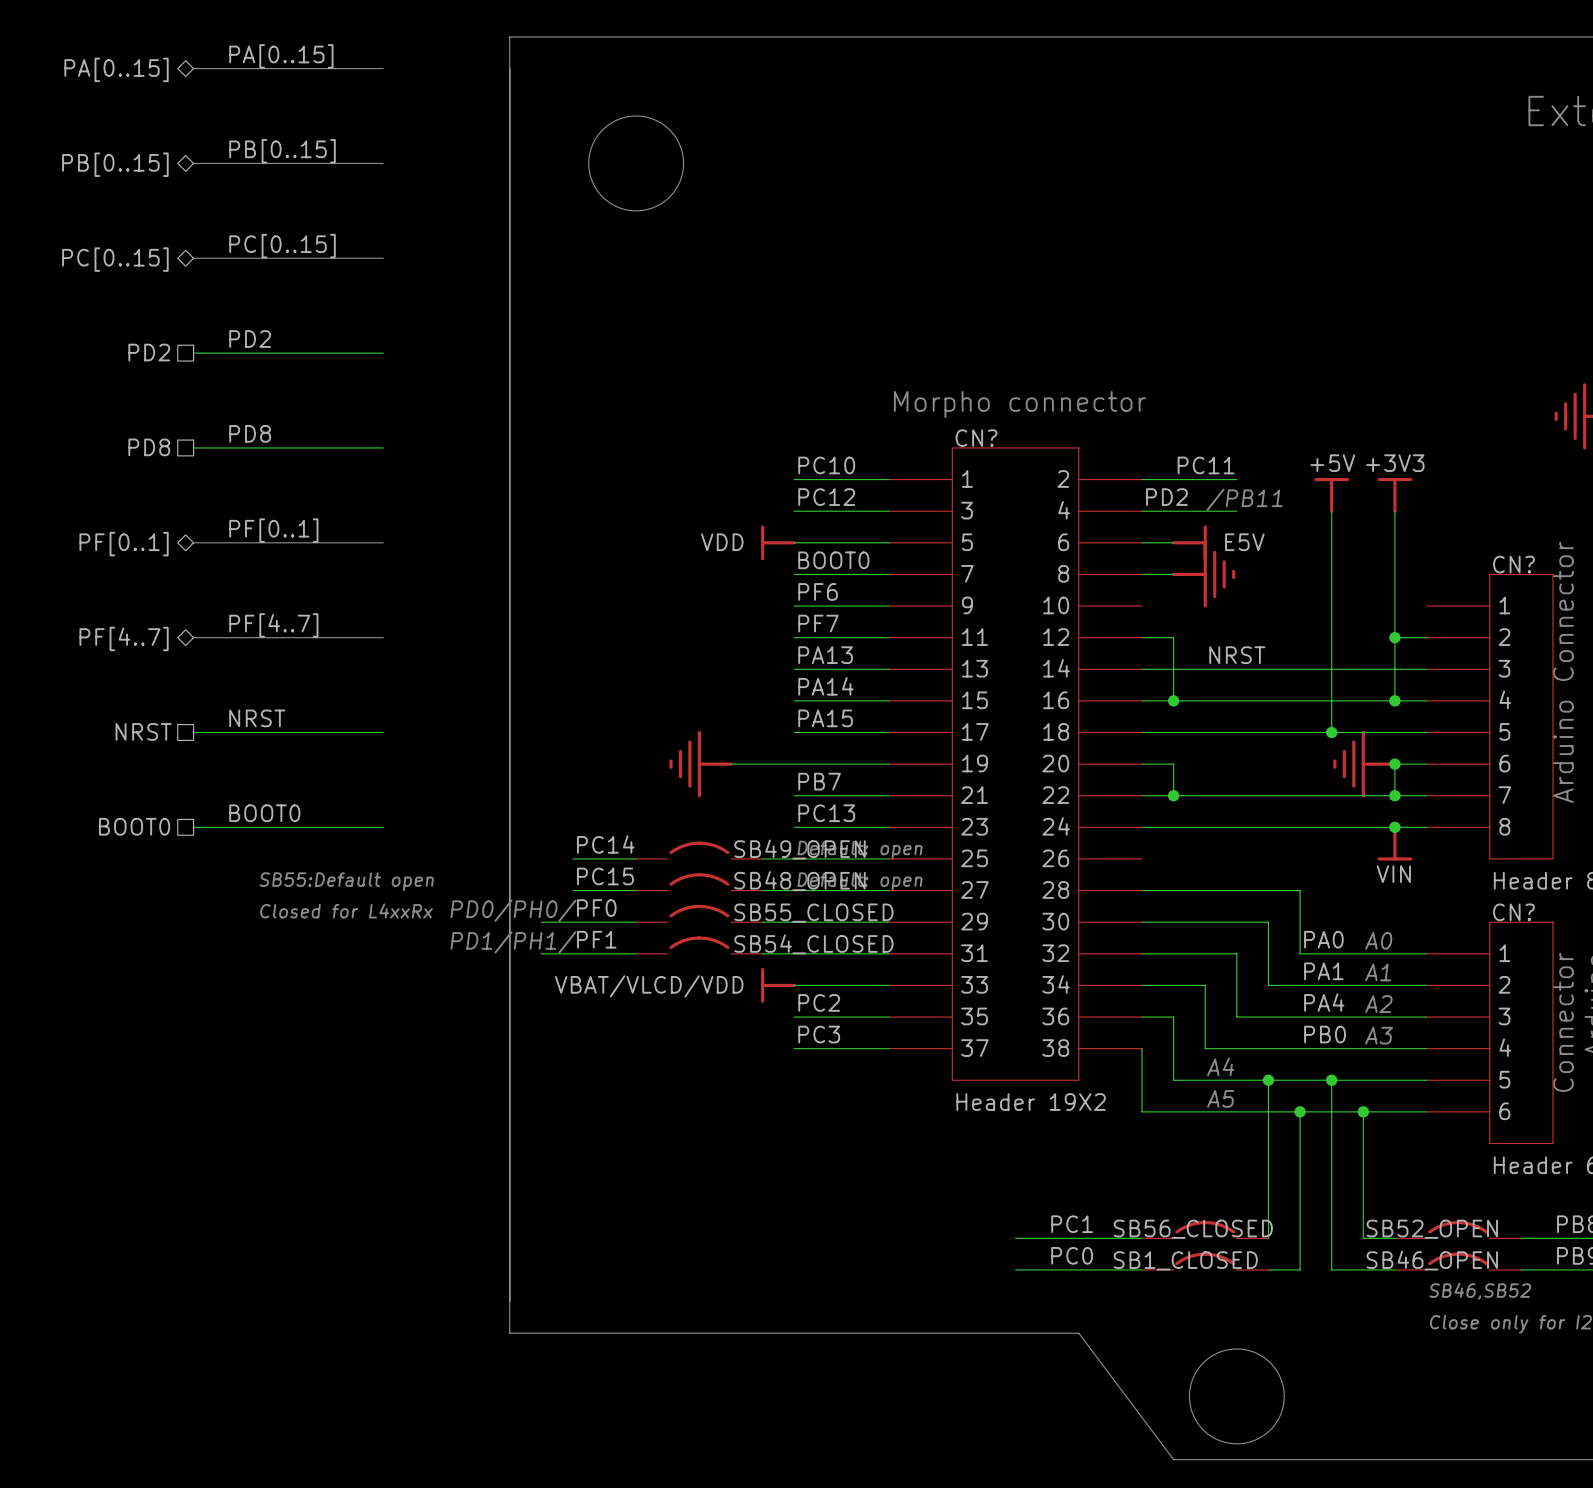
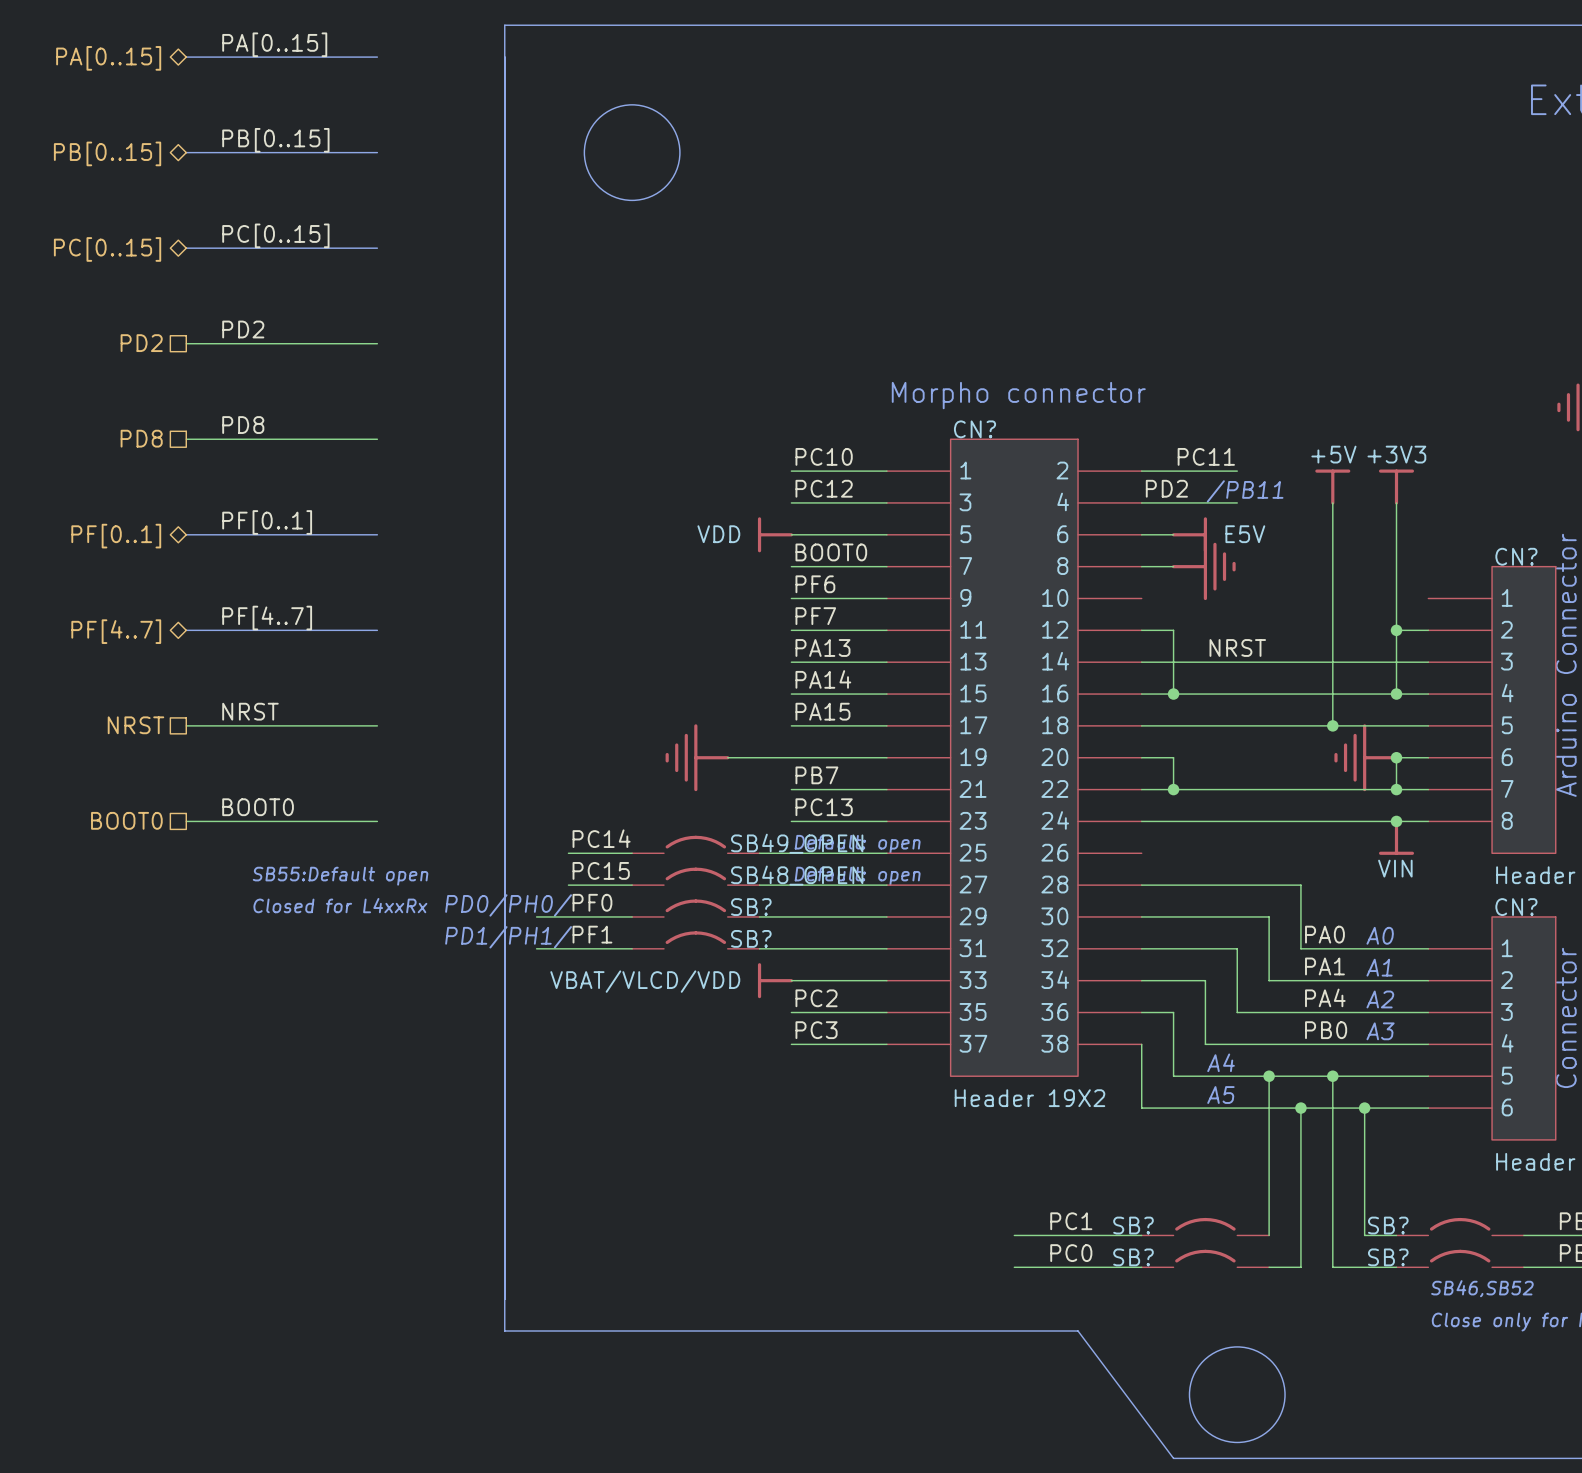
SB55_CLOSED name: SB55_CLOSED (813, 913) -> SB? (751, 907)
SB54_CLOSED name: SB54_CLOSED (813, 944) -> SB? (751, 938)
SB56_CLOSED name: SB56_CLOSED (1193, 1229) -> SB? (1133, 1225)
SB52_OPEN name: SB52_OPEN (1432, 1229) -> SB? (1388, 1225)
SB1_CLOSED name: SB1_CLOSED (1185, 1260) -> SB? (1133, 1257)
SB46_OPEN name: SB46_OPEN (1432, 1260) -> SB? (1388, 1257)

